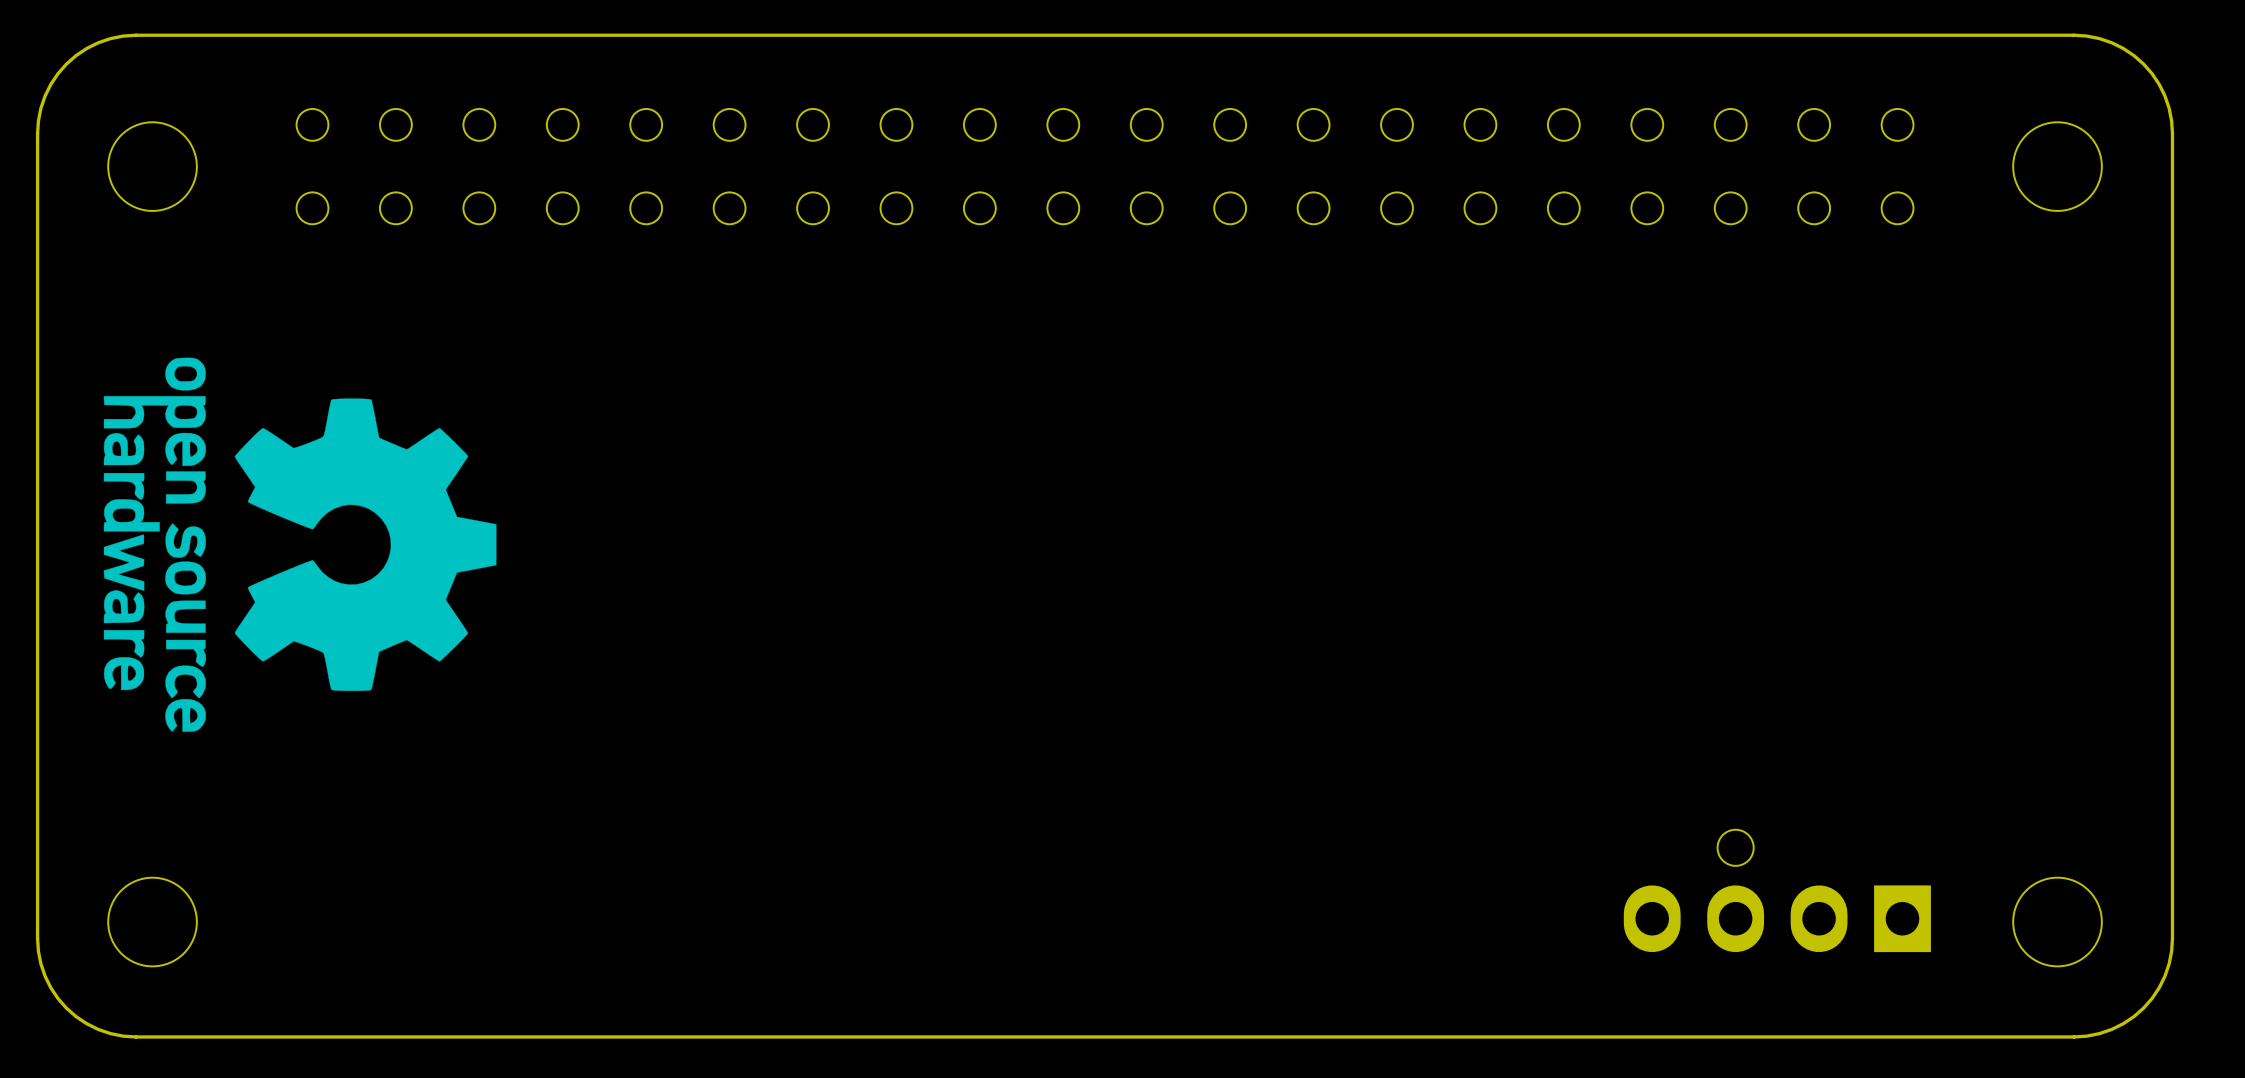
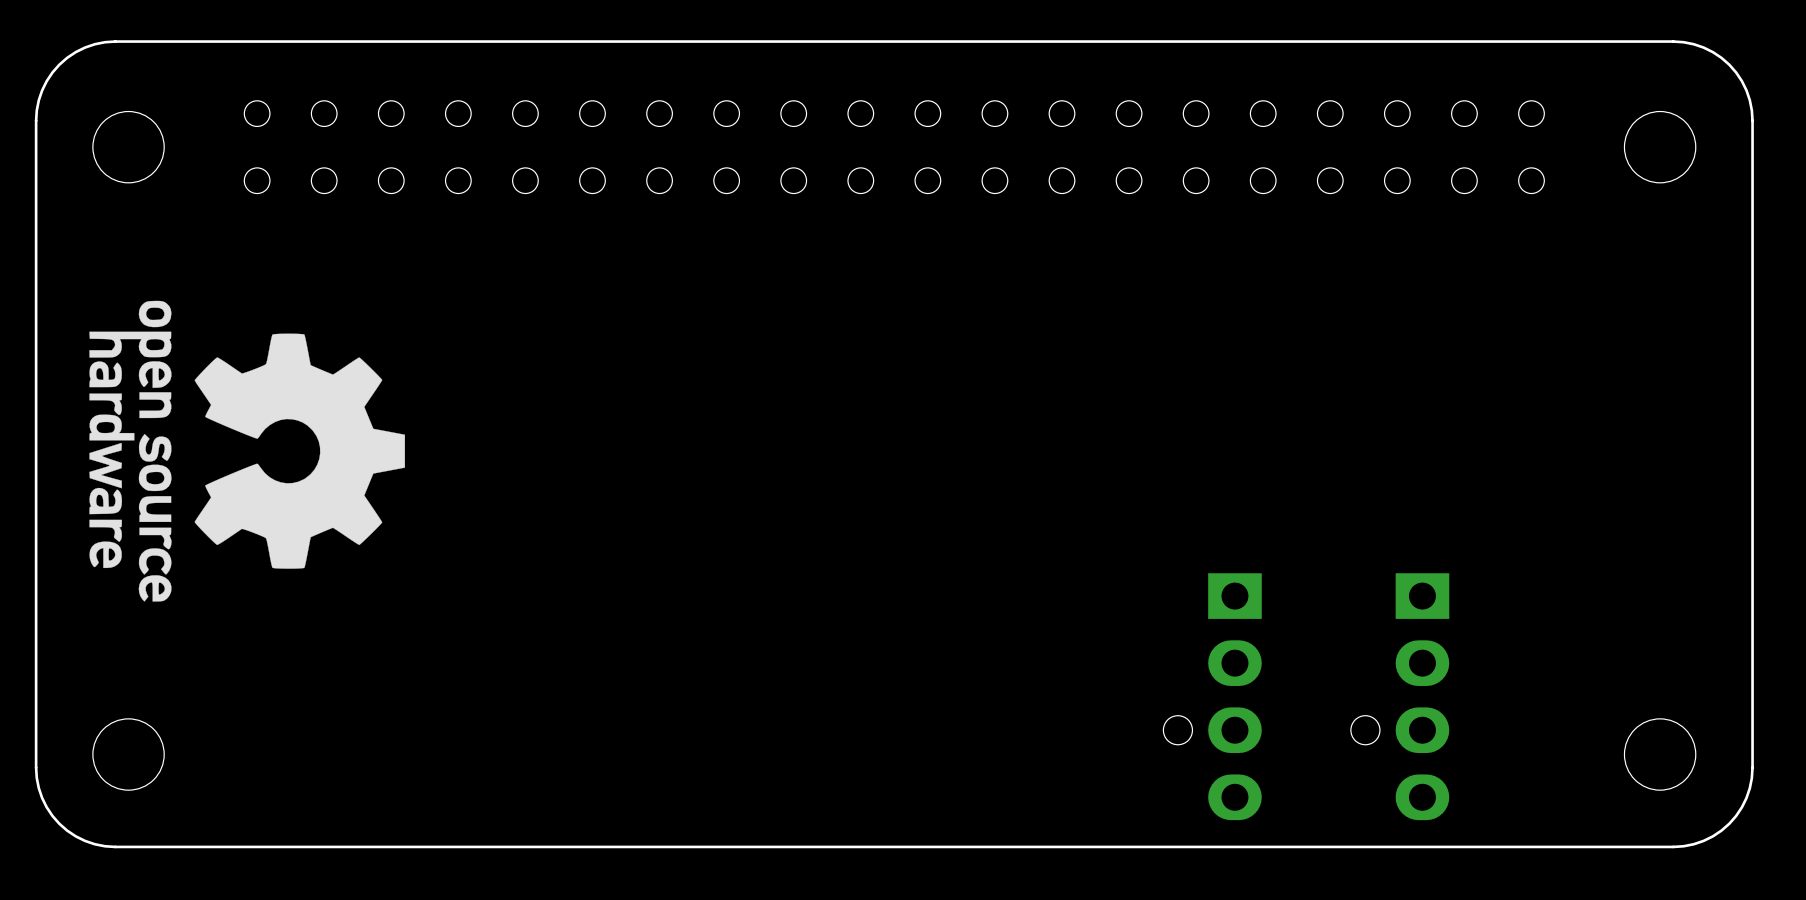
part: none -> (1212, 696)
part rotation: 0° (1777, 890) -> 90° counterclockwise (1400, 696)

